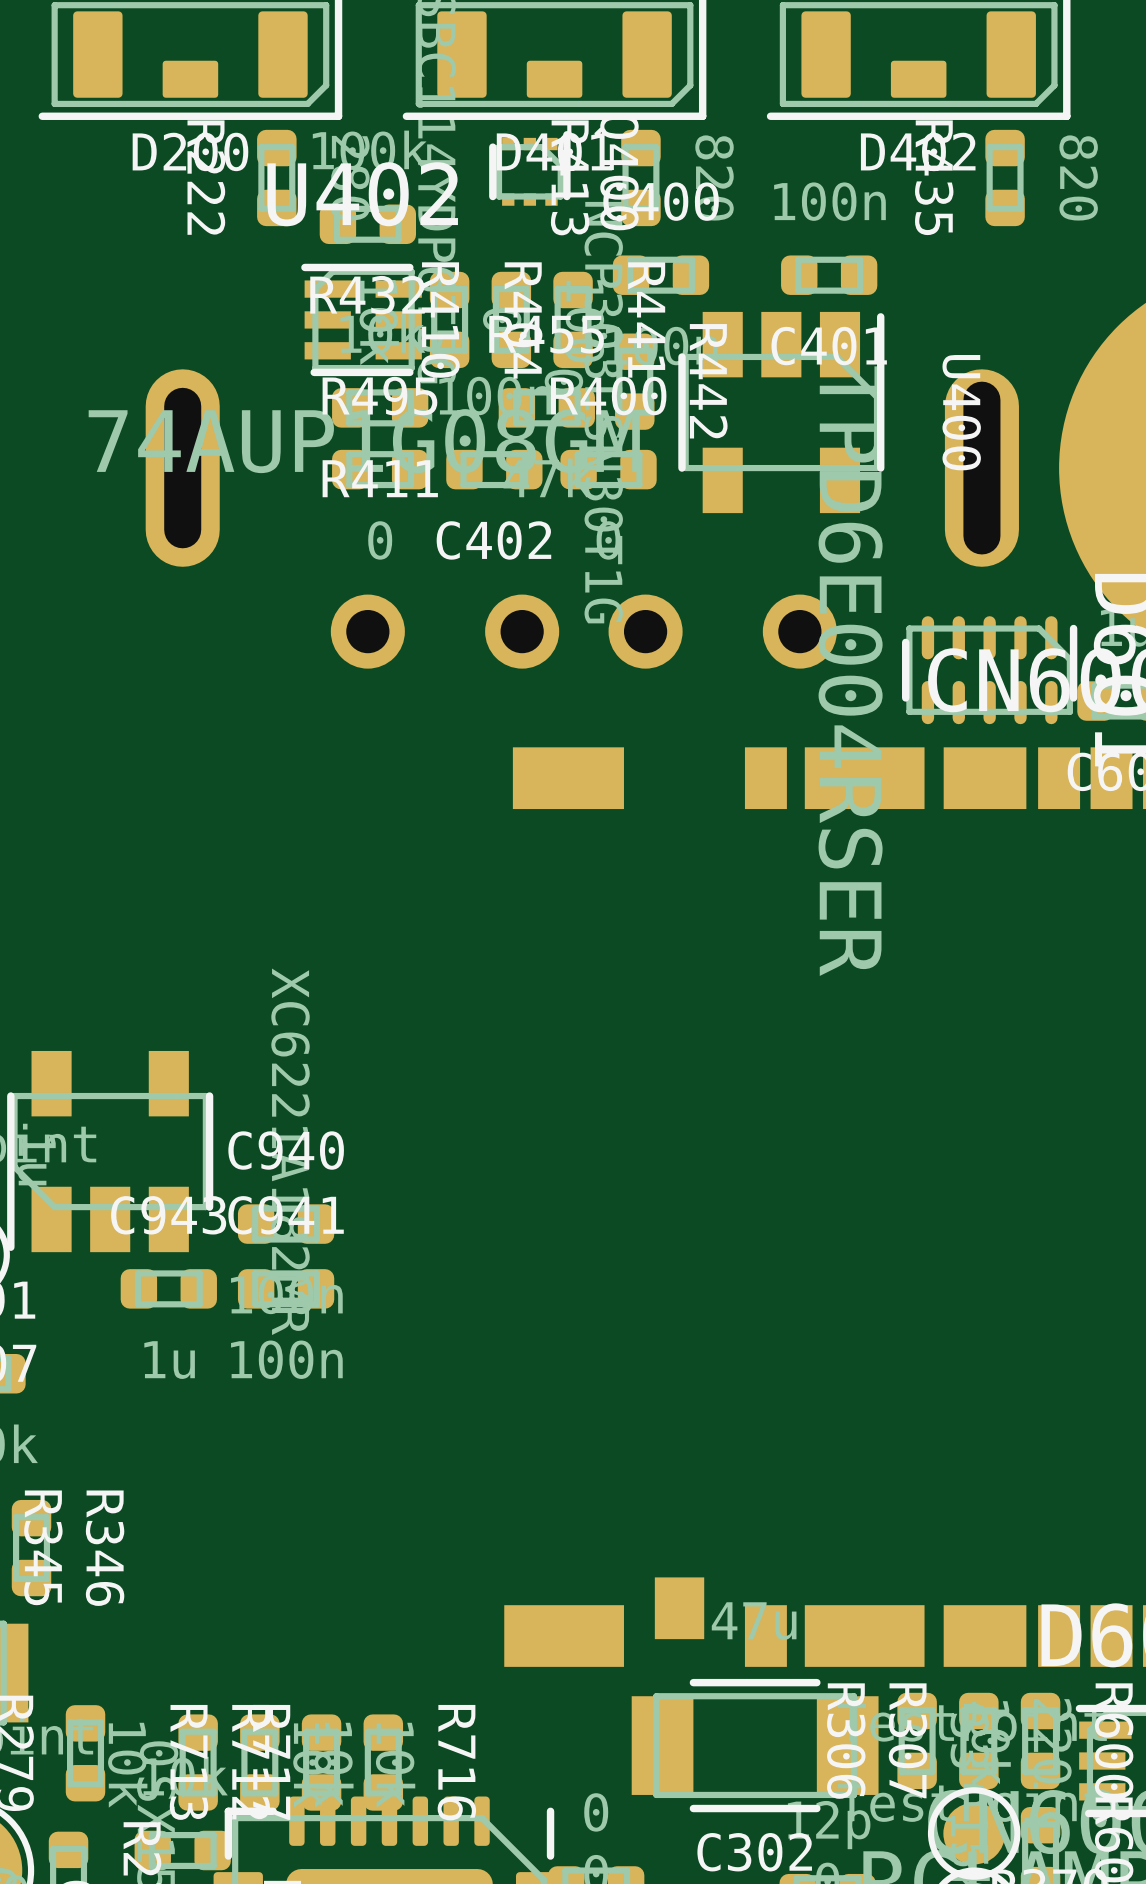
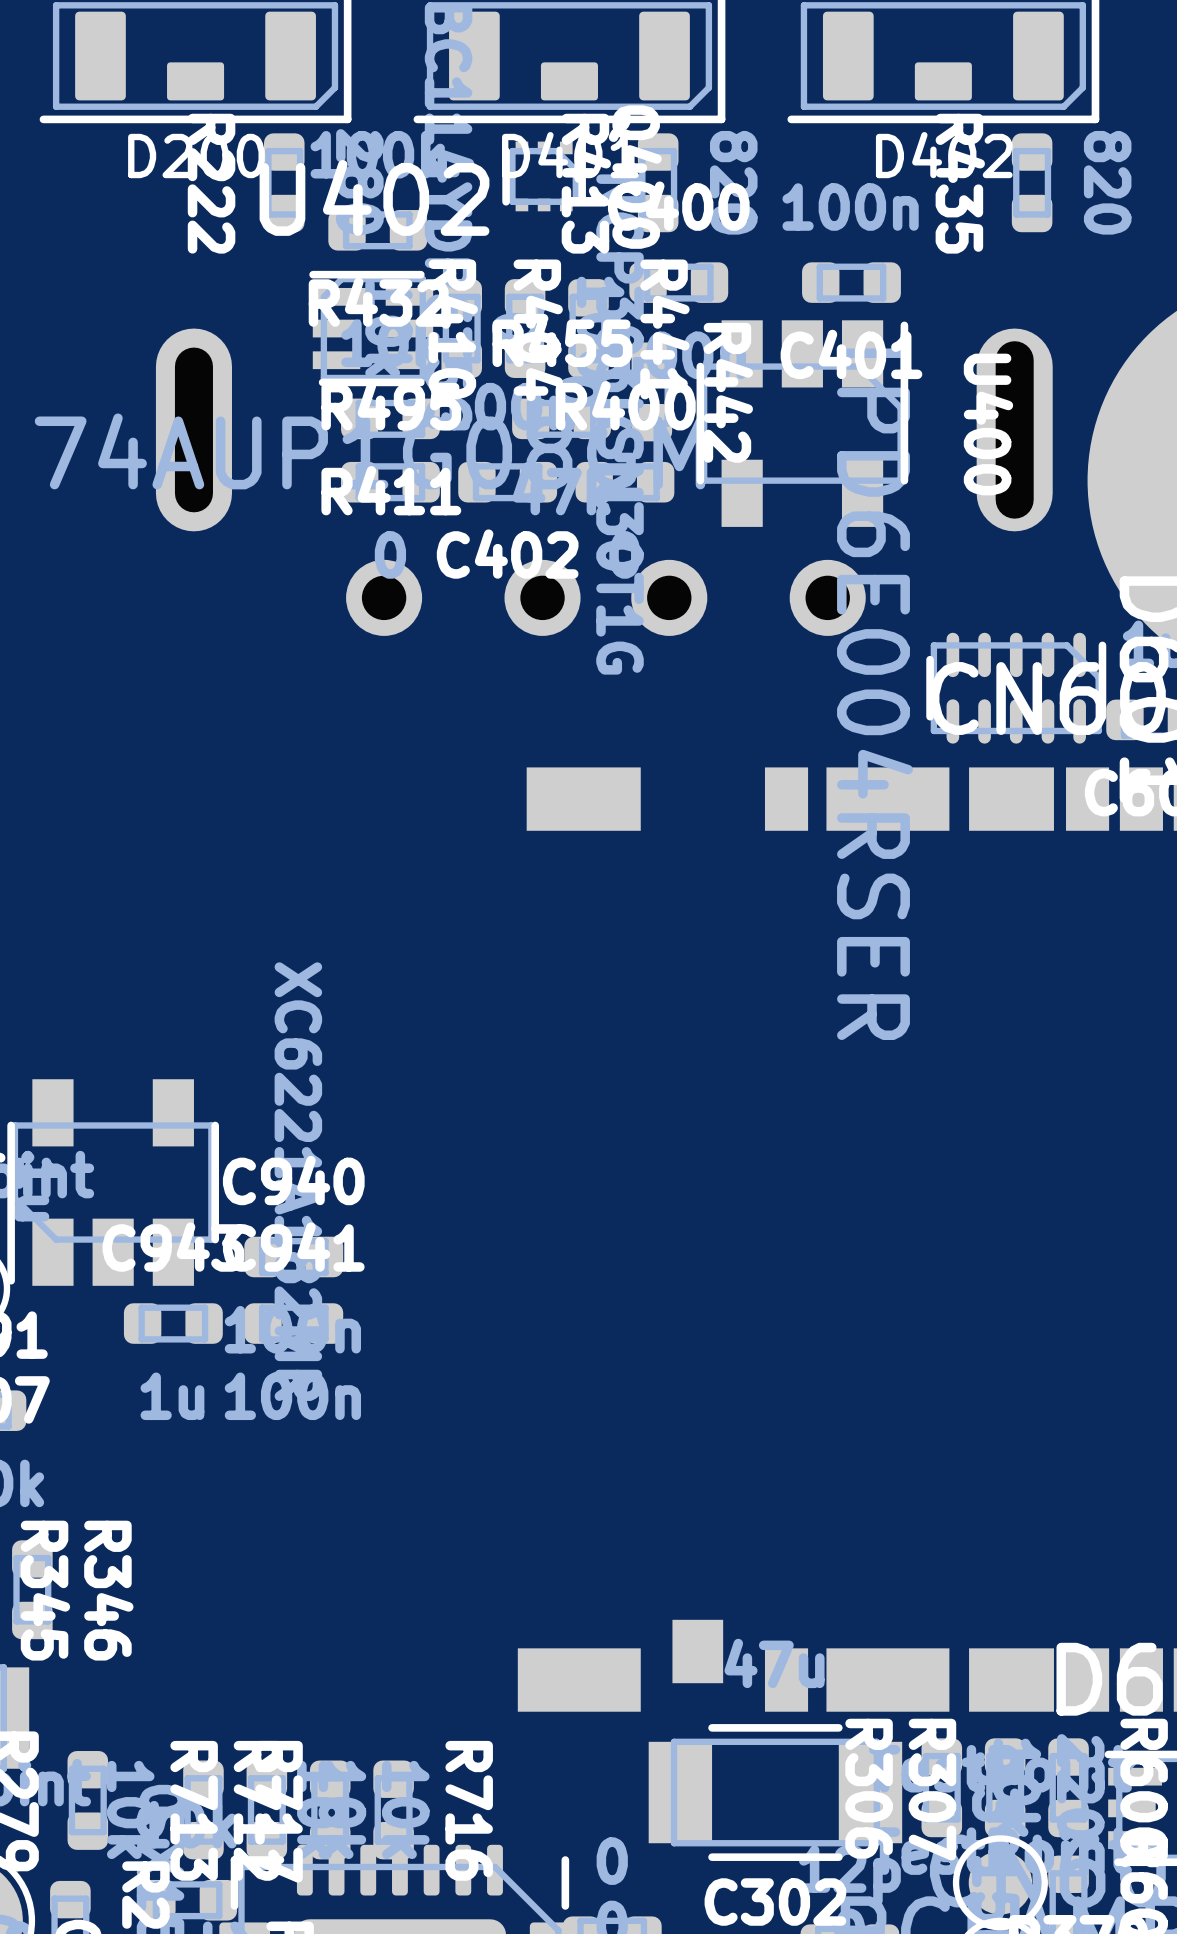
part position: (582, 518) -> (604, 482)

